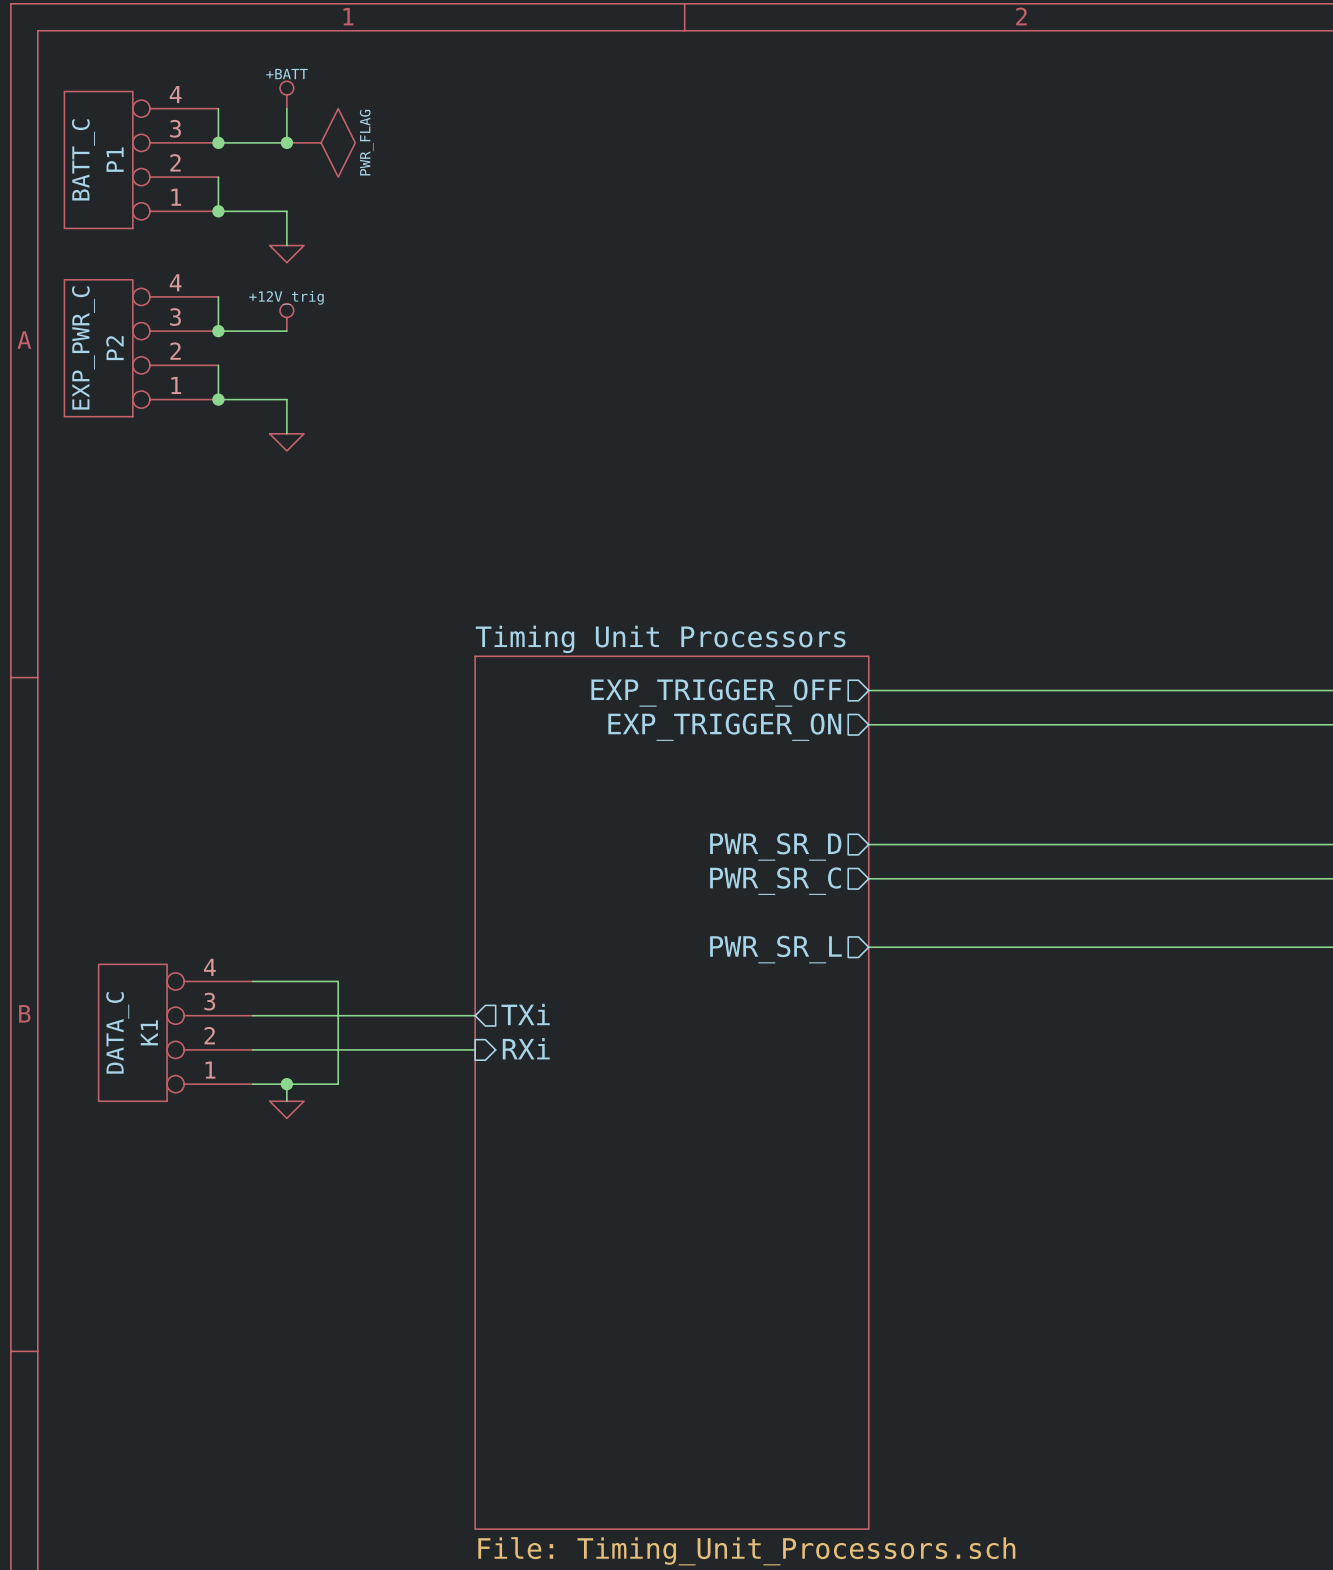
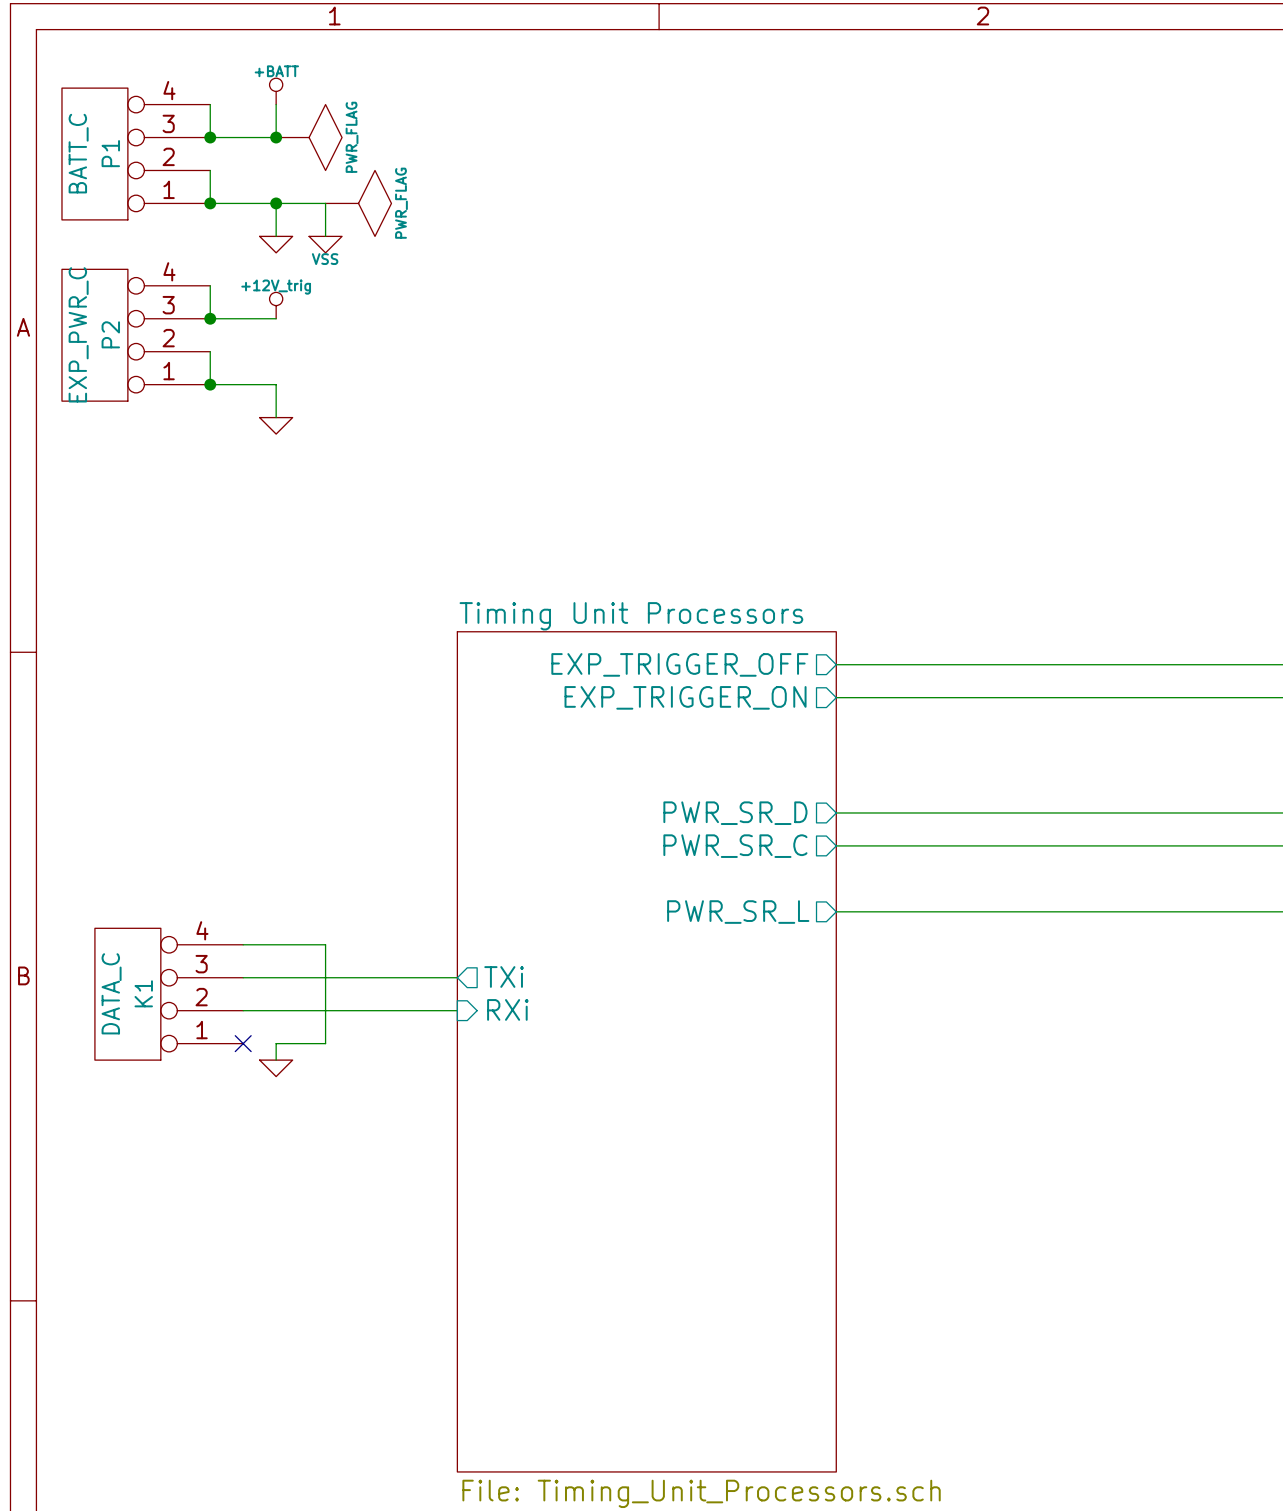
wire: none -> (276, 203) (325, 203) (325, 236)
junction: none -> (276, 203)
power symbol: none -> PWR_FLAG (358, 203)
power symbol: none -> VSS (325, 244)
wire: (252, 1084) (286, 1084) -> none
no-connect mark: none -> (243, 1043)
junction: (286, 1084) -> none

